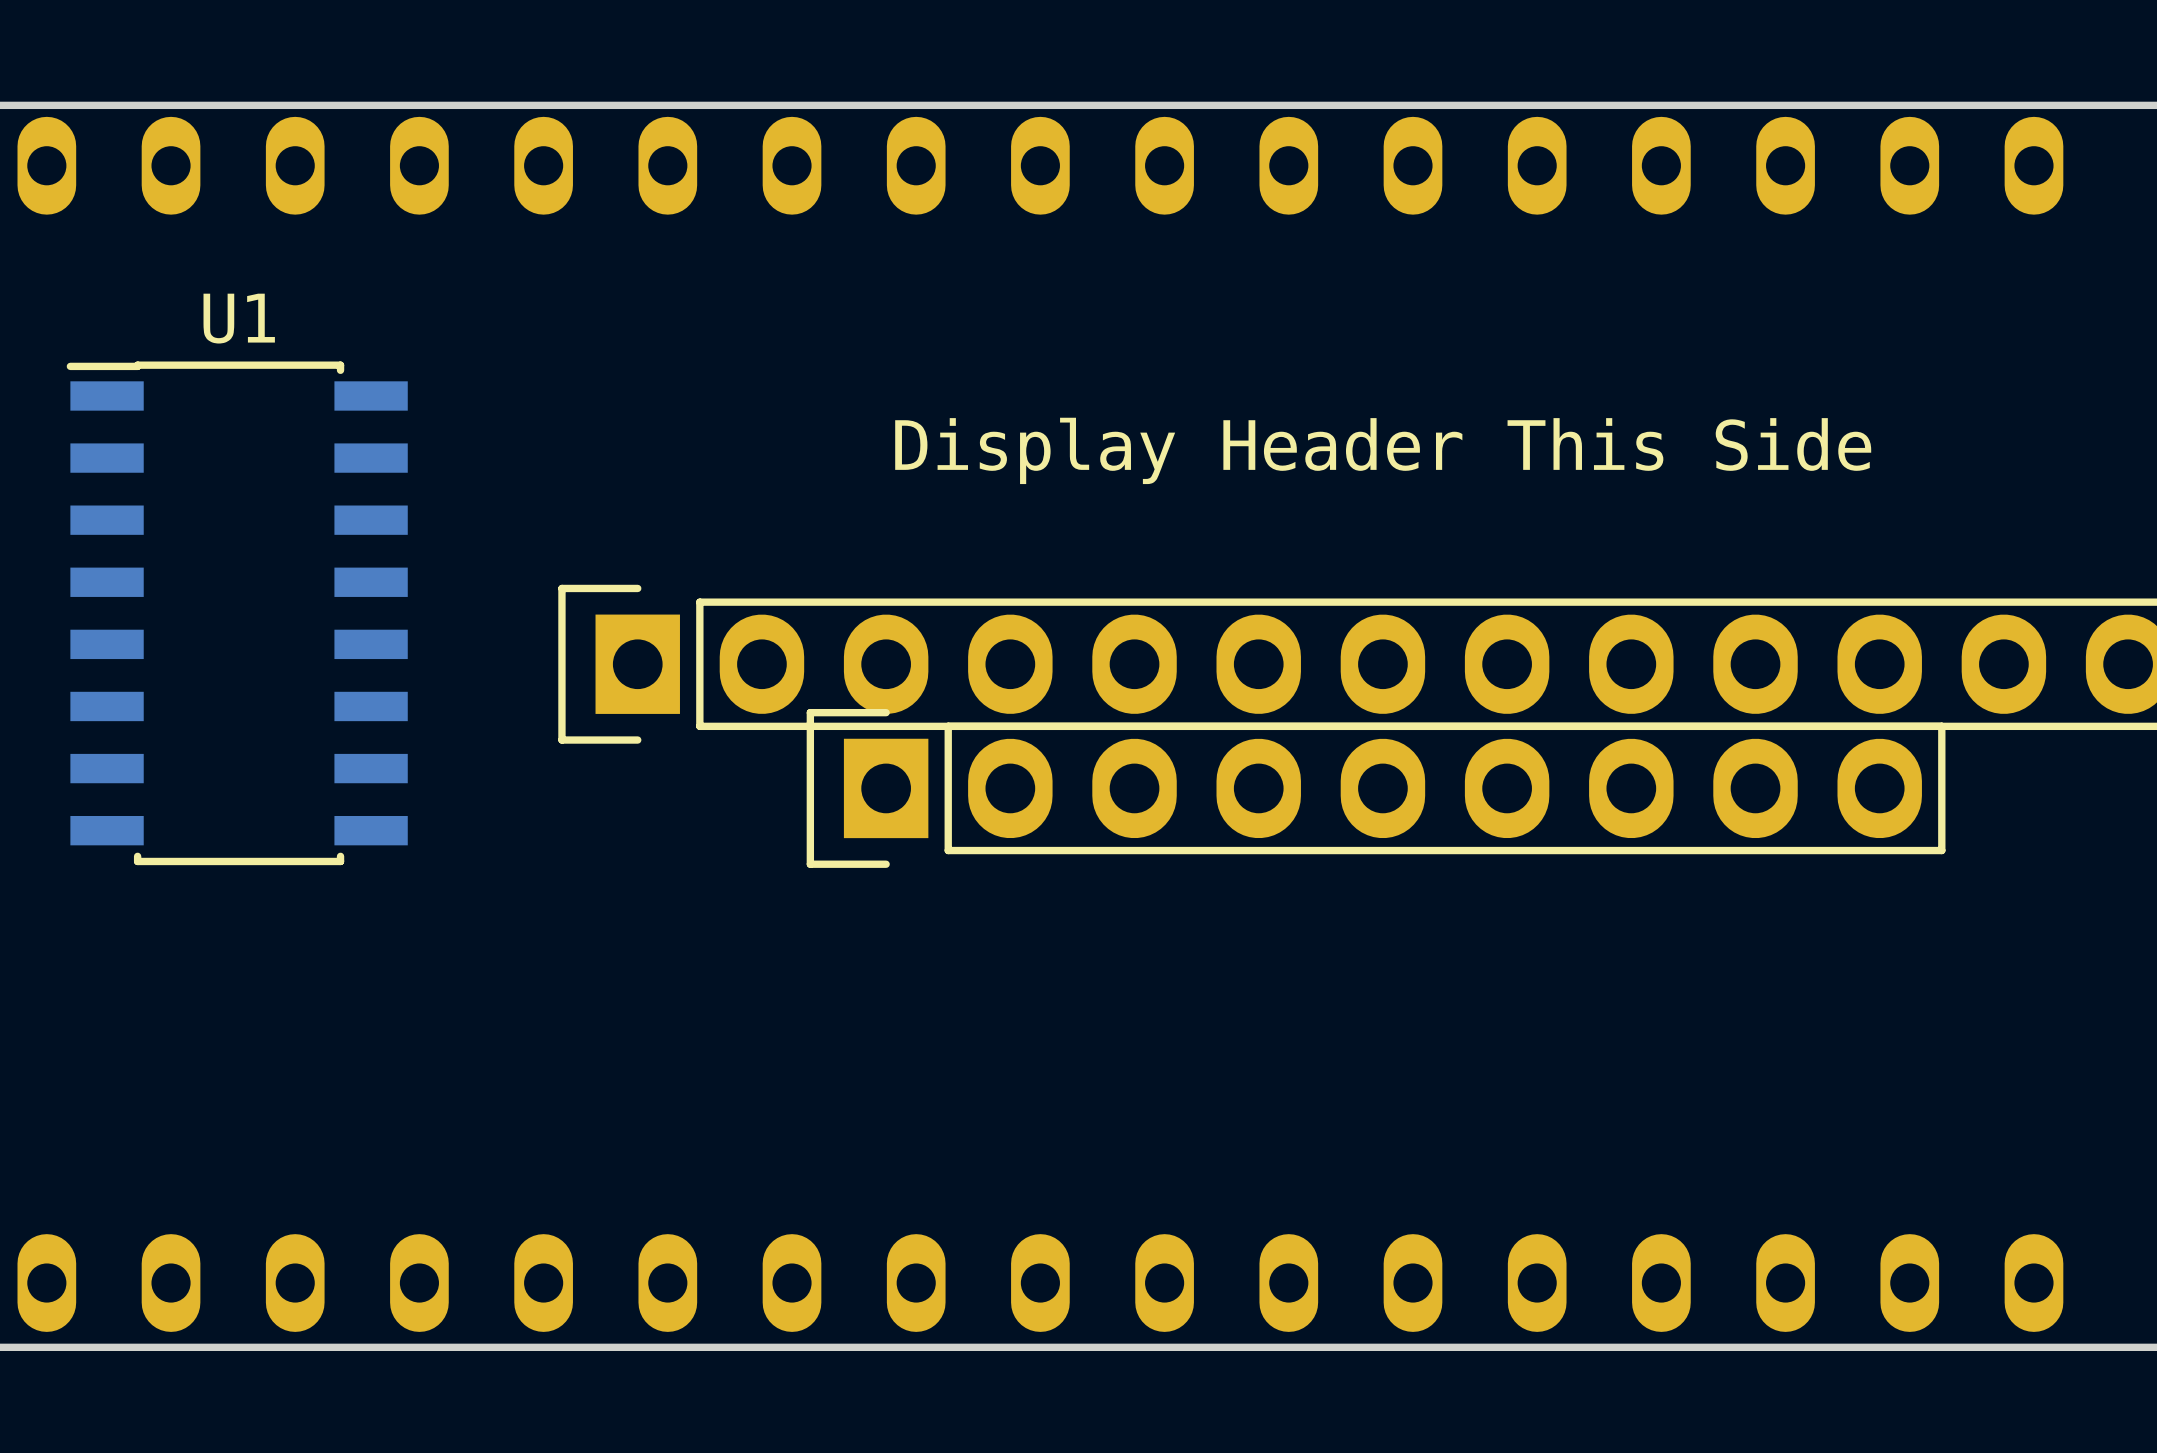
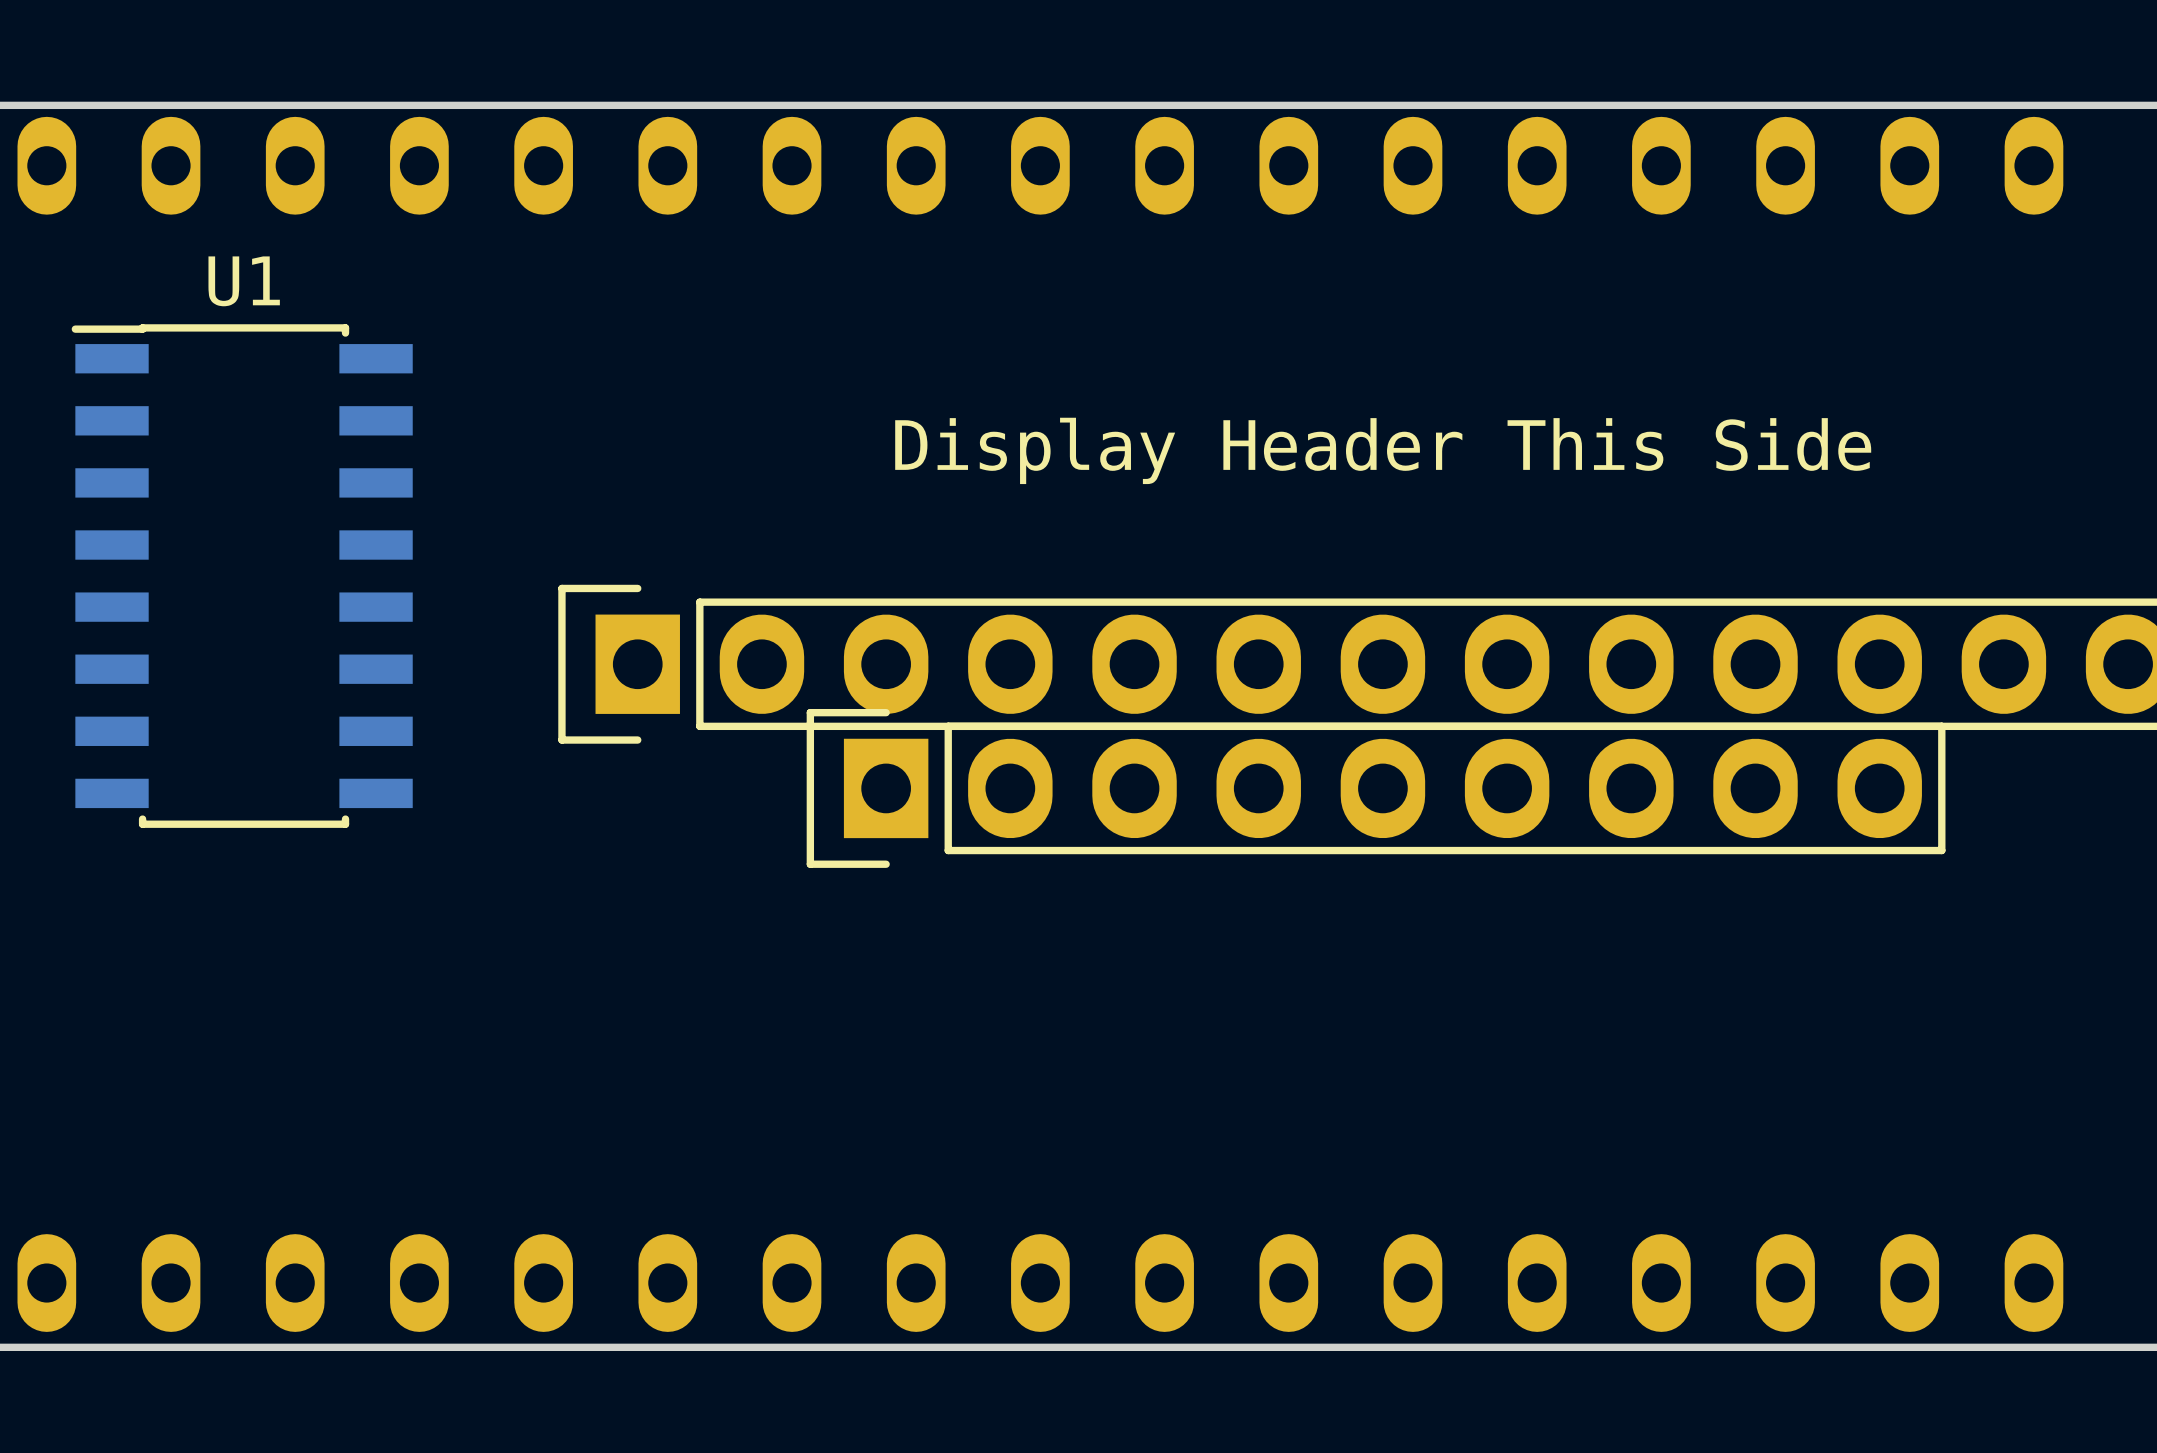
U1 position: (237, 613) -> (242, 576)

